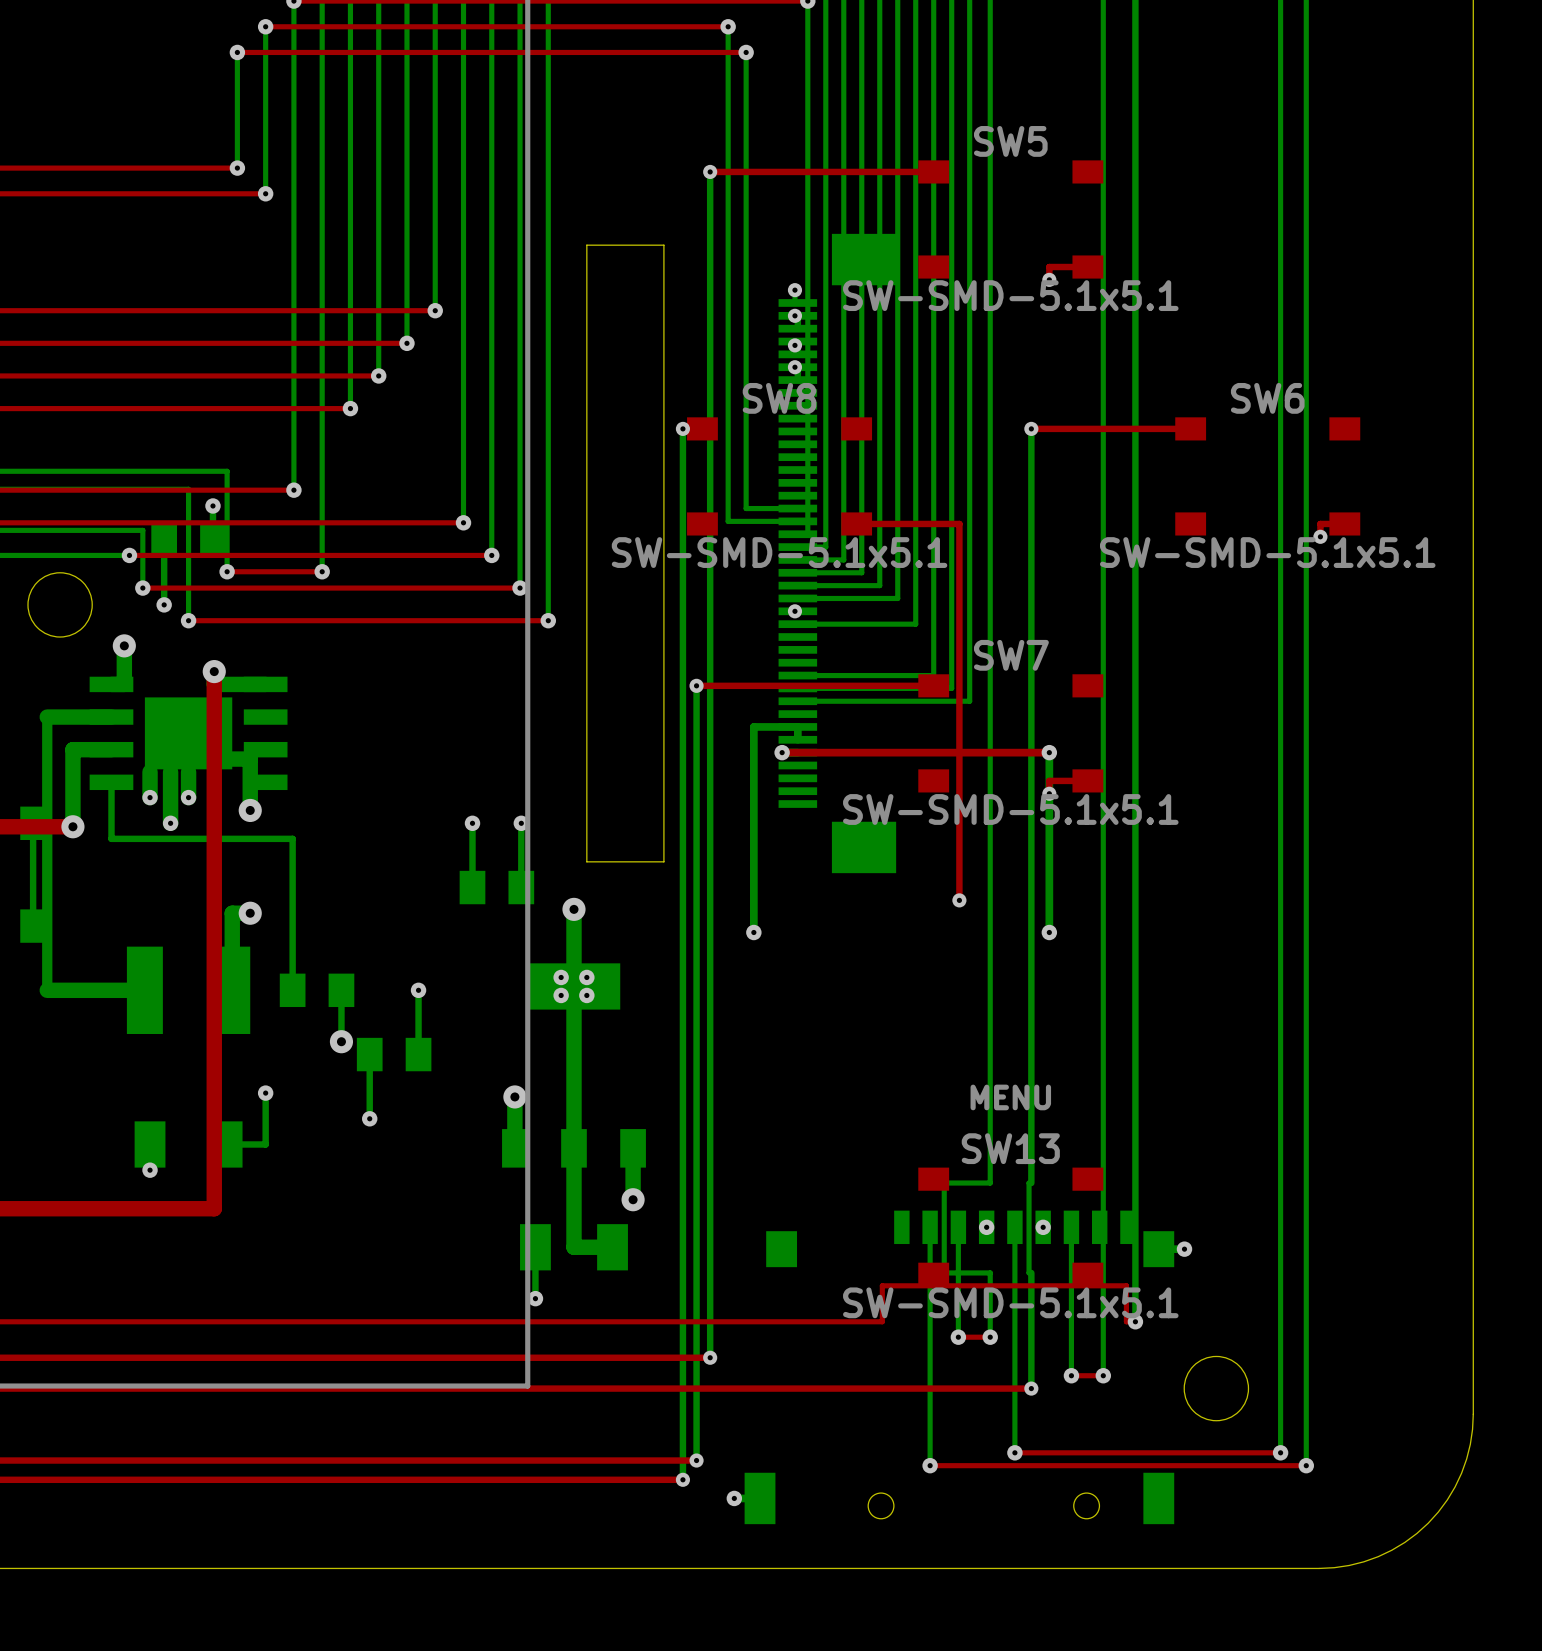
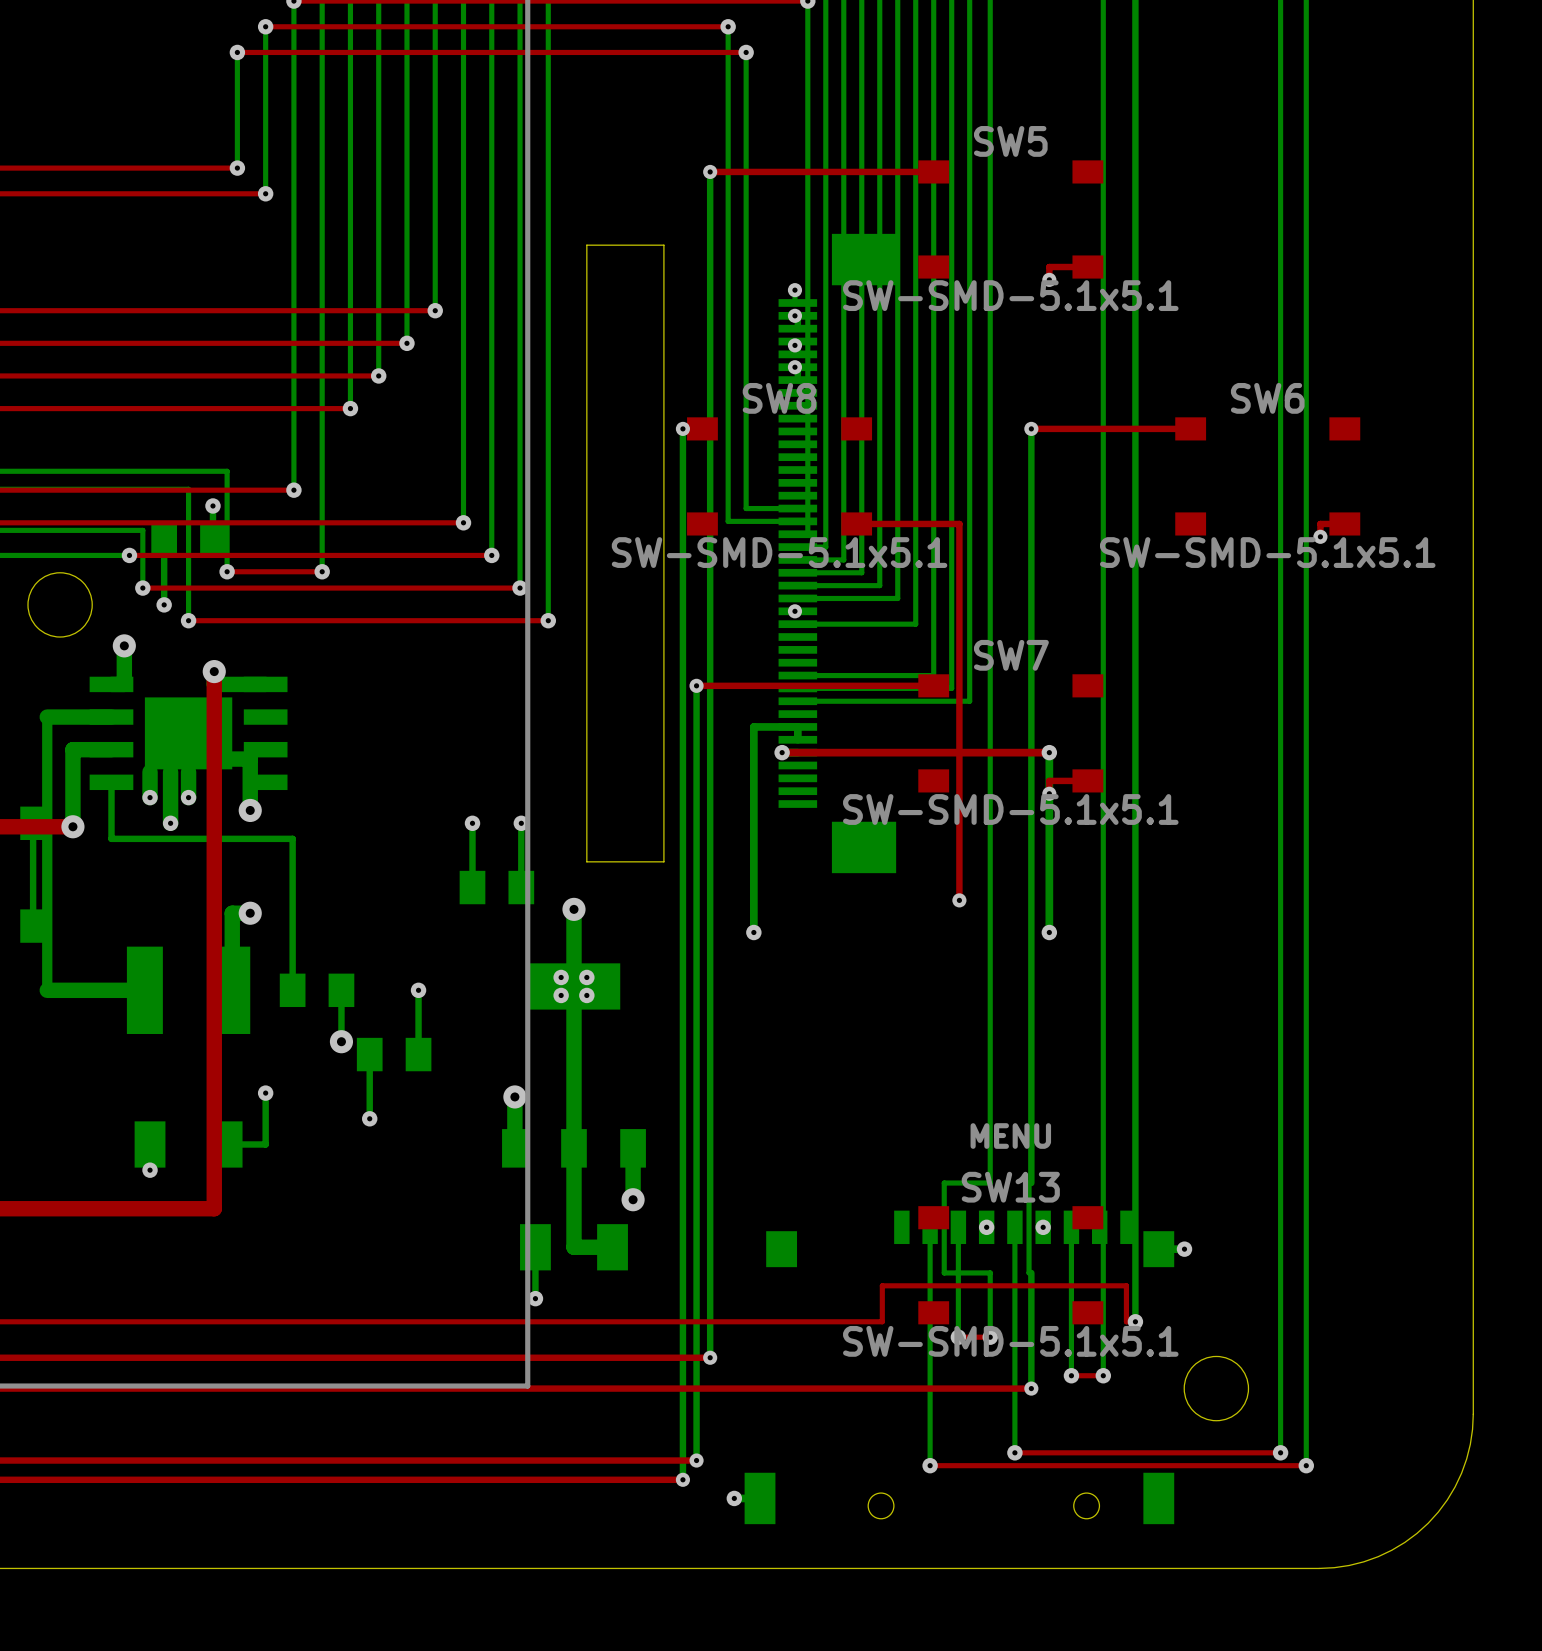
text position: MENU (1010, 1097) -> MENU (1010, 1136)
SW13 position: (1010, 1226) -> (1010, 1265)

